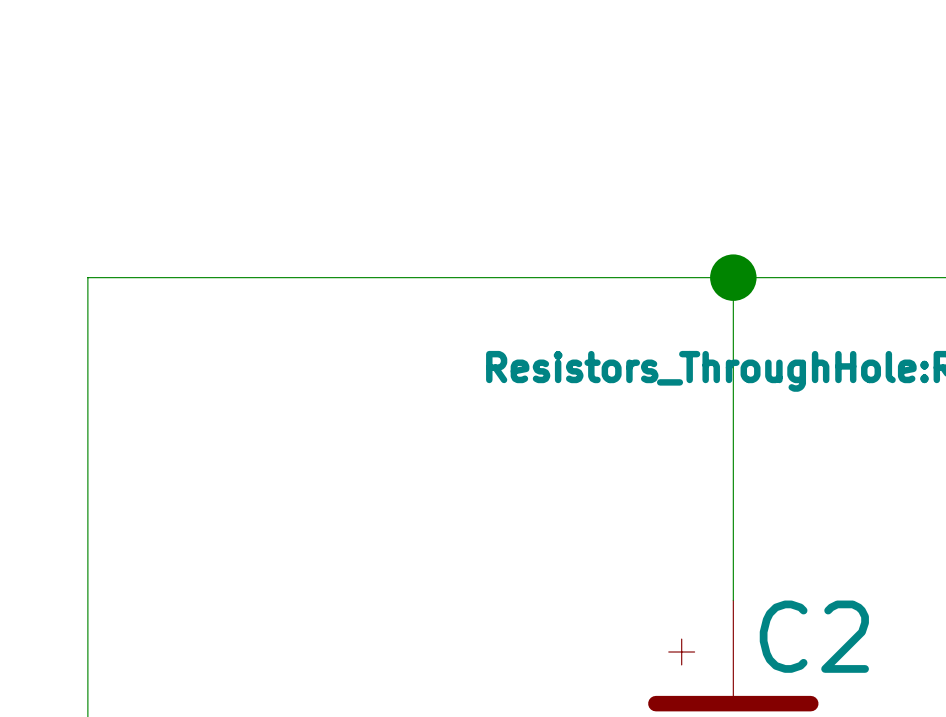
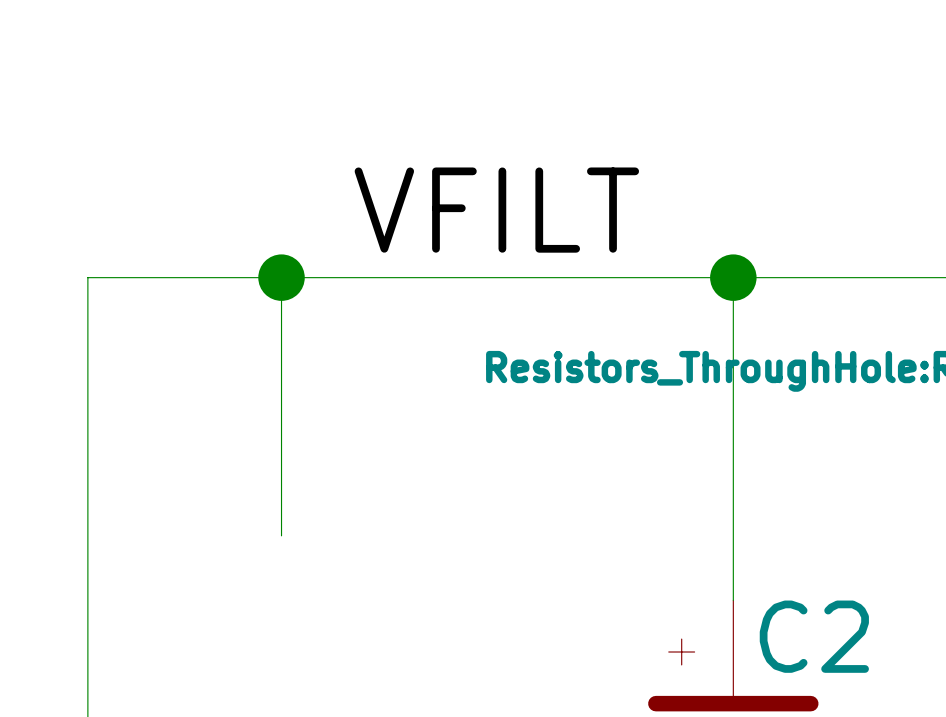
label: none -> VFILT (496, 210)
wire: none -> (281, 277) (281, 535)
junction: none -> (281, 277)

